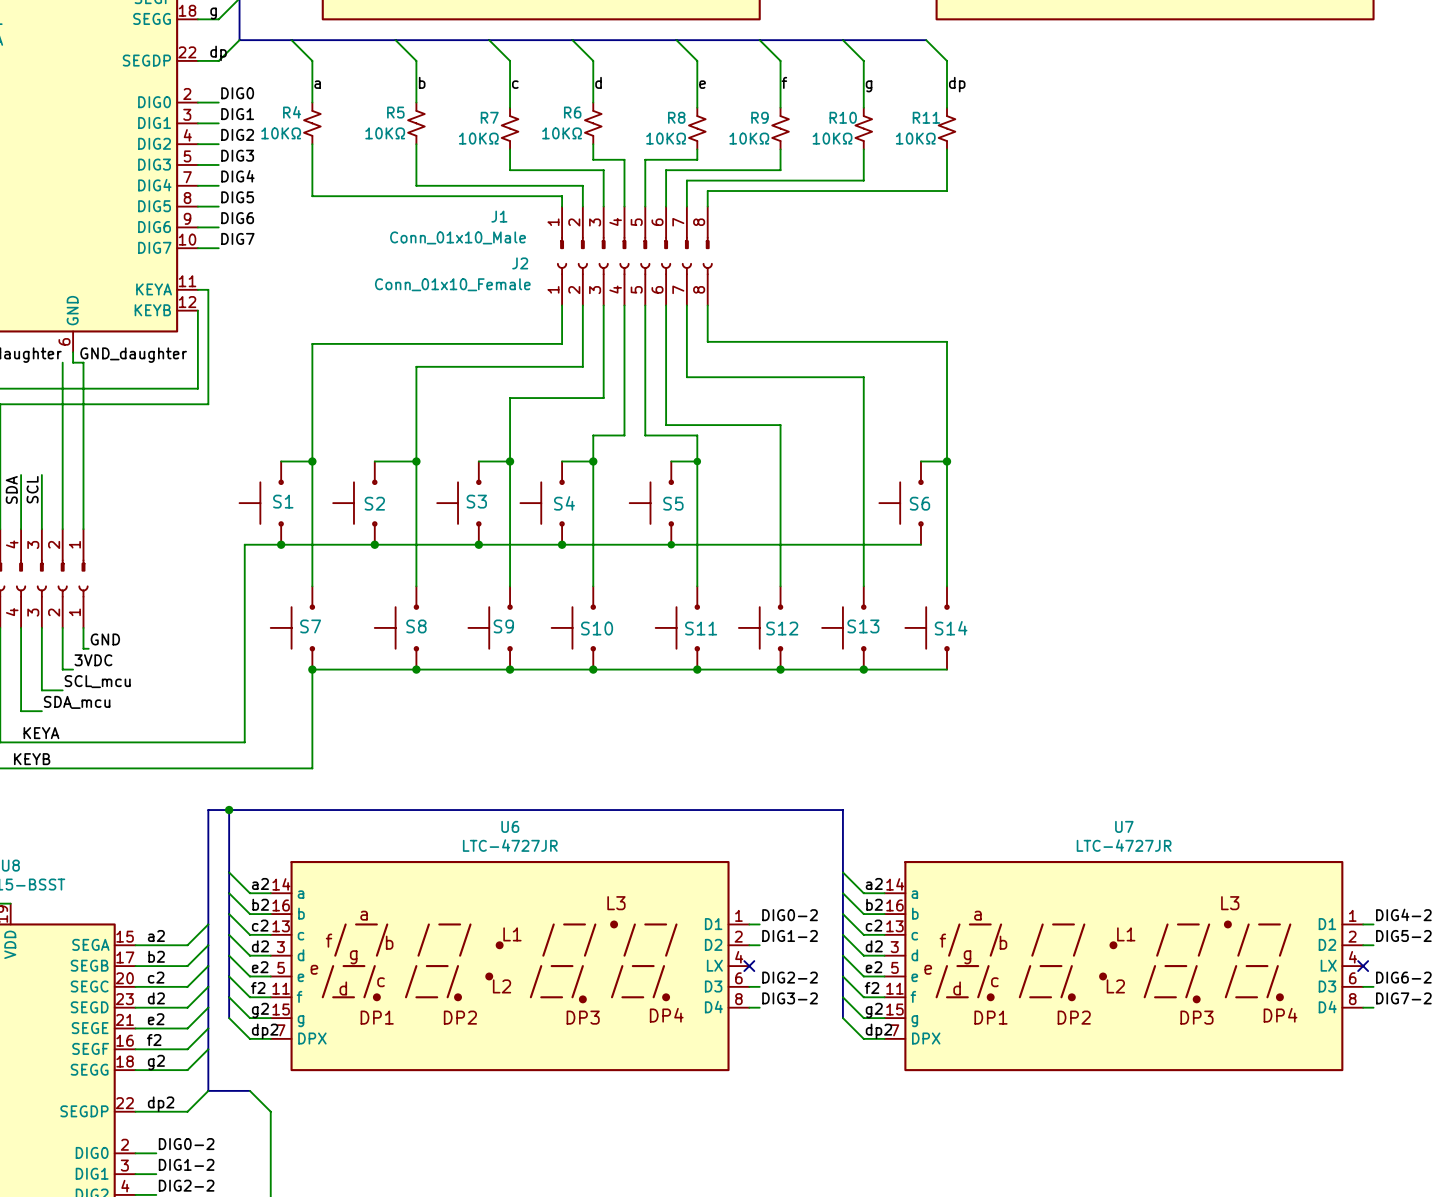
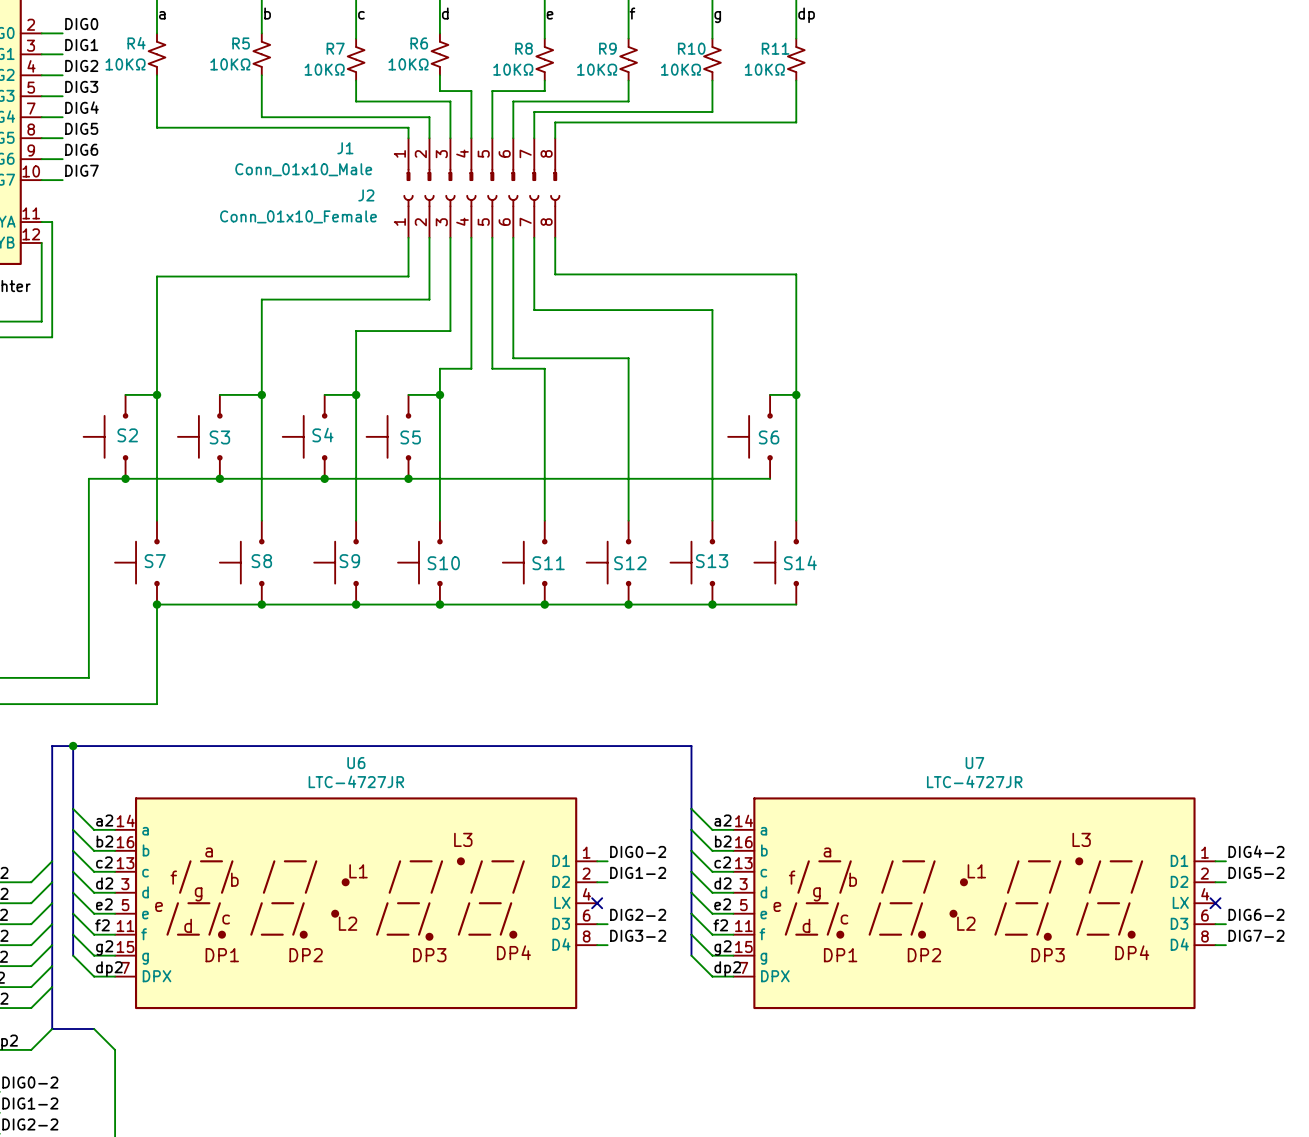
wire: (671, 461) (697, 461) -> none
junction: (697, 461) -> none
S1 name: S1 (283, 501) -> S2 (127, 435)
S3 name: S3 (476, 501) -> S4 (322, 435)
S2 name: S2 (374, 503) -> S3 (219, 437)
S4 name: S4 (564, 503) -> S5 (410, 437)
S5: (651, 503) -> none
junction: (671, 544) -> none

